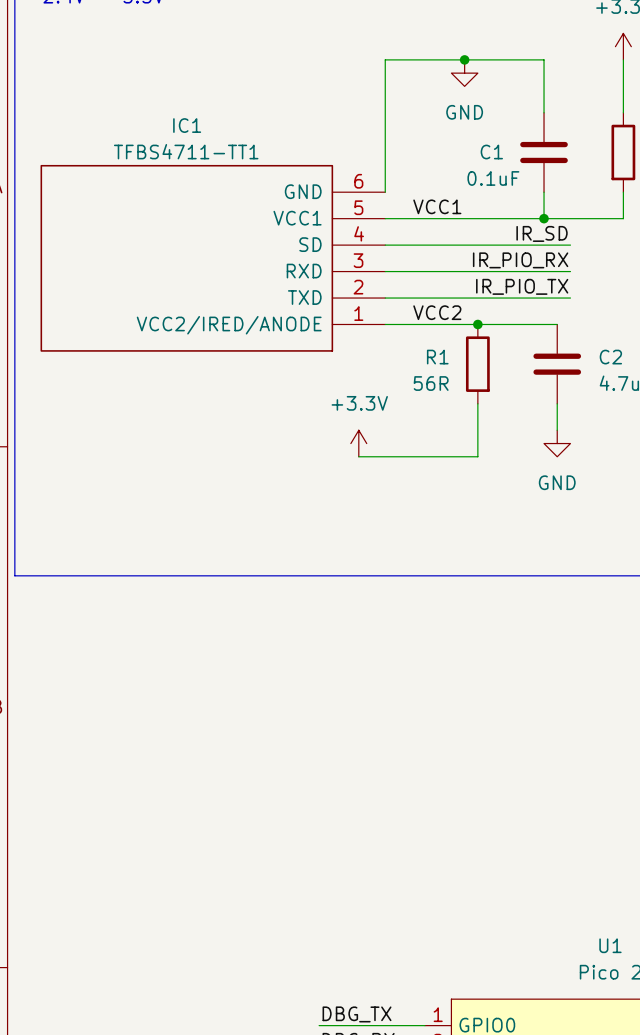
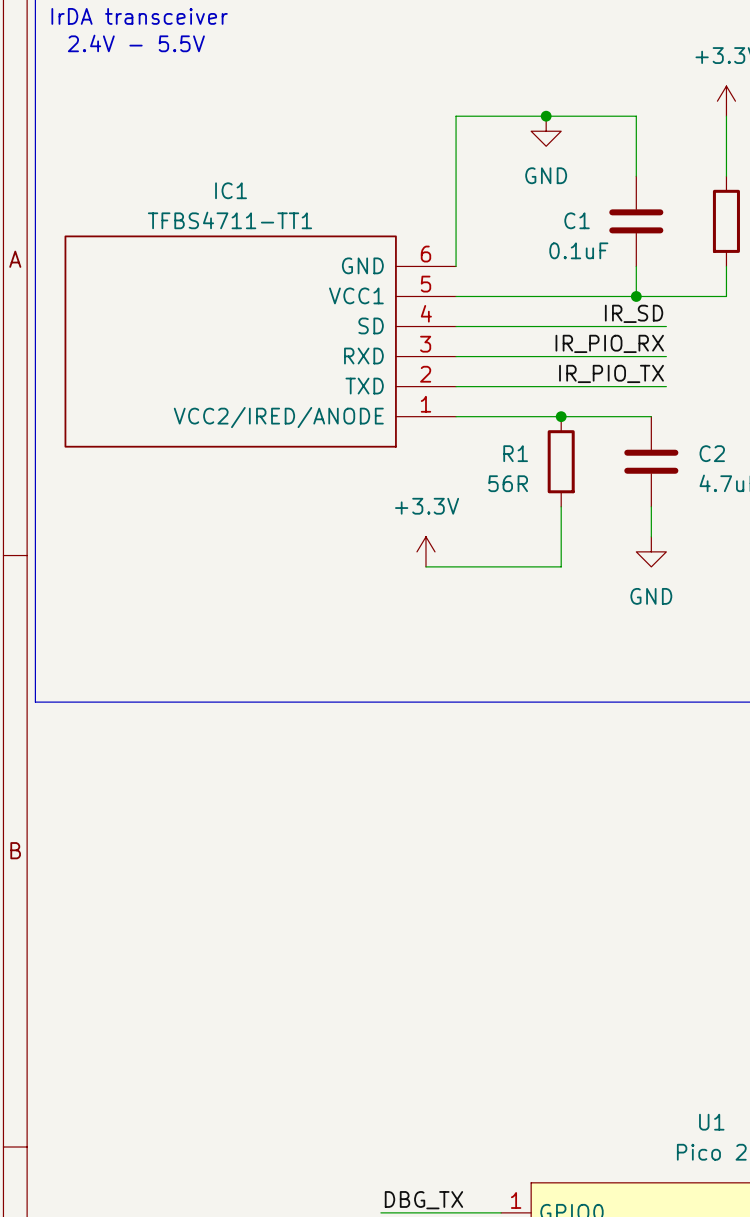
label: VCC1 (437, 206) -> none
label: VCC2 (437, 312) -> none

